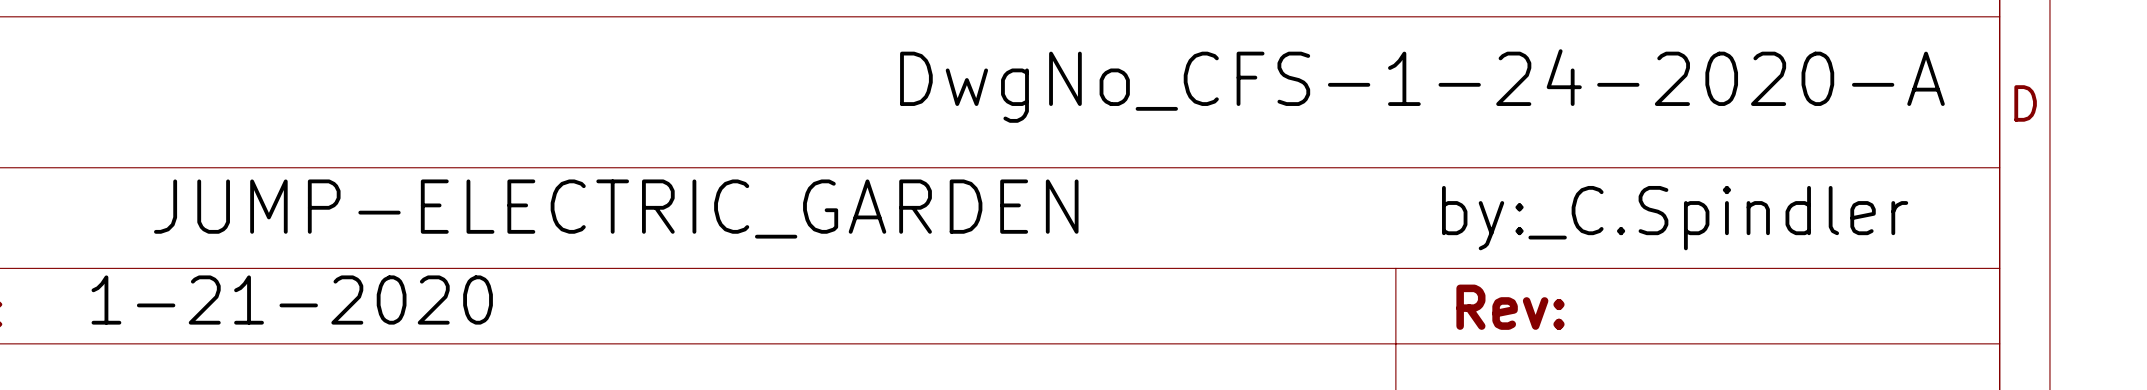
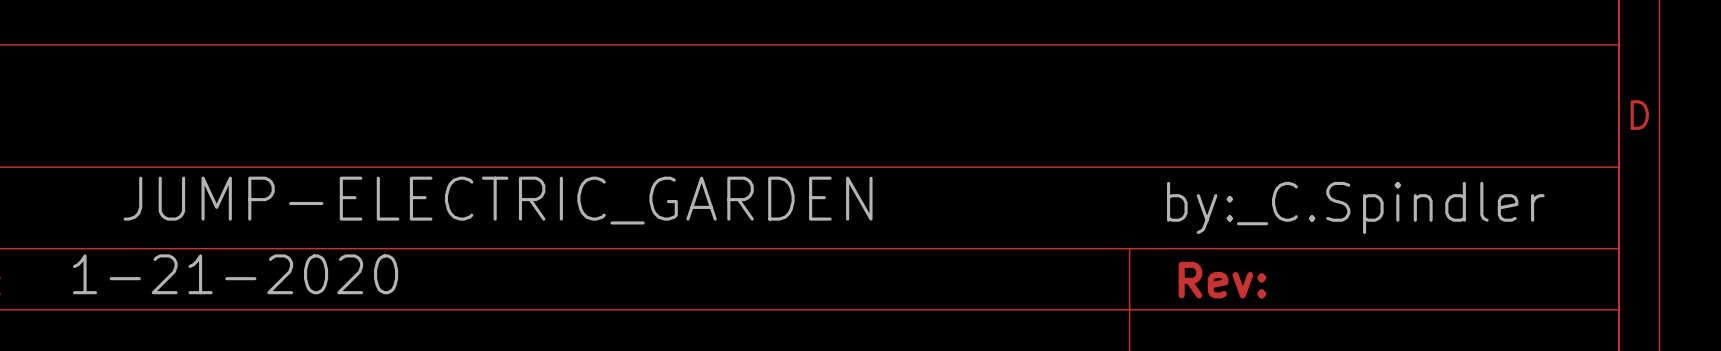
label: DwgNo_CFS-1-24-2020-A (1422, 86) -> none

